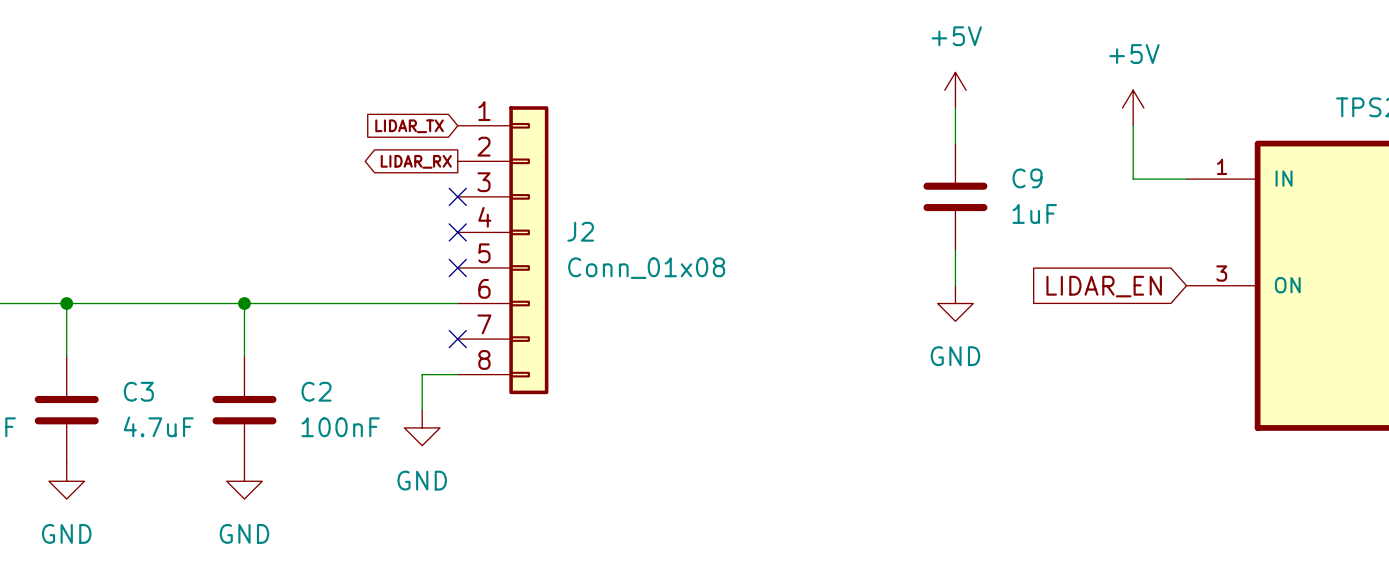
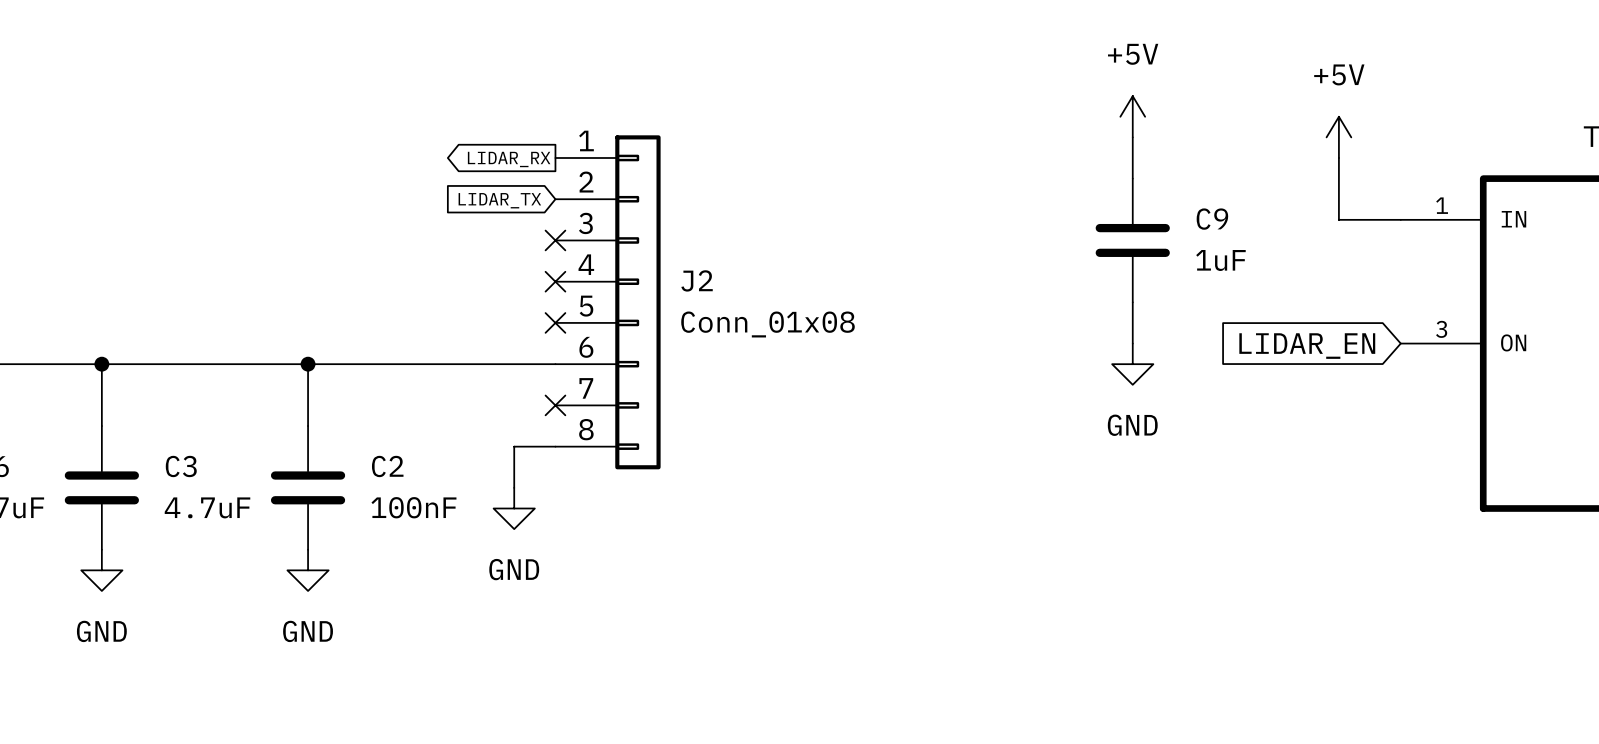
global label shape: input (409, 126) -> output (509, 159)
global label: LIDAR_TX (409, 126) -> LIDAR_RX (509, 159)
global label shape: output (416, 161) -> input (499, 200)
global label: LIDAR_RX (416, 161) -> LIDAR_TX (499, 200)

